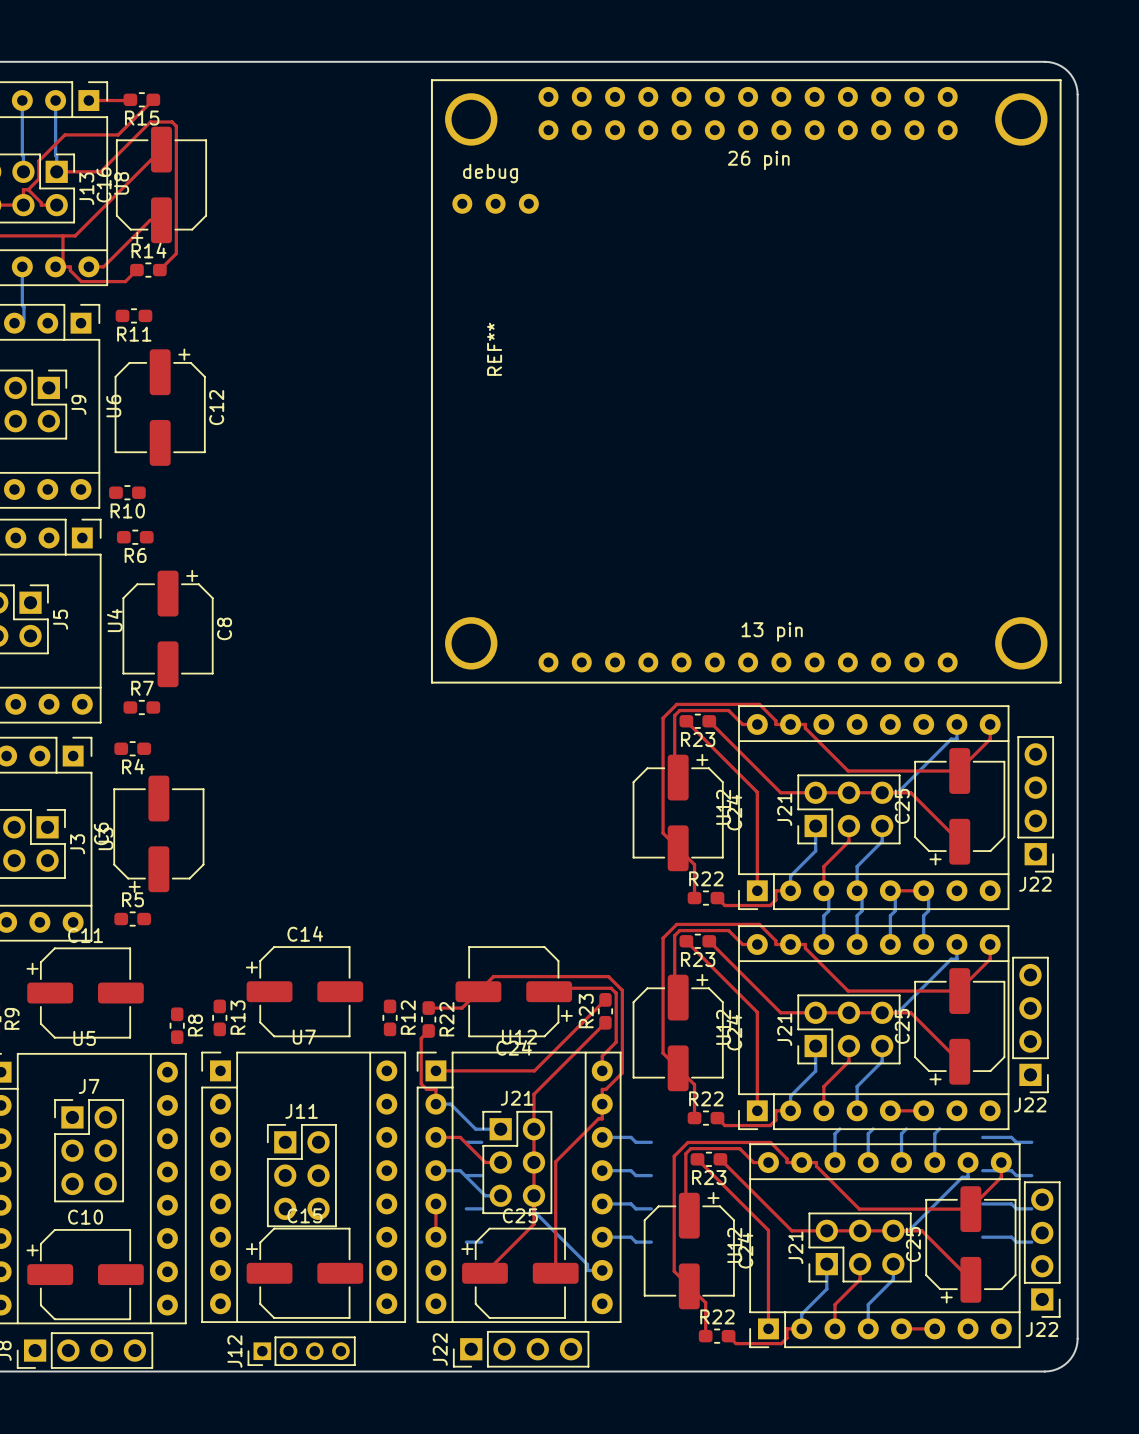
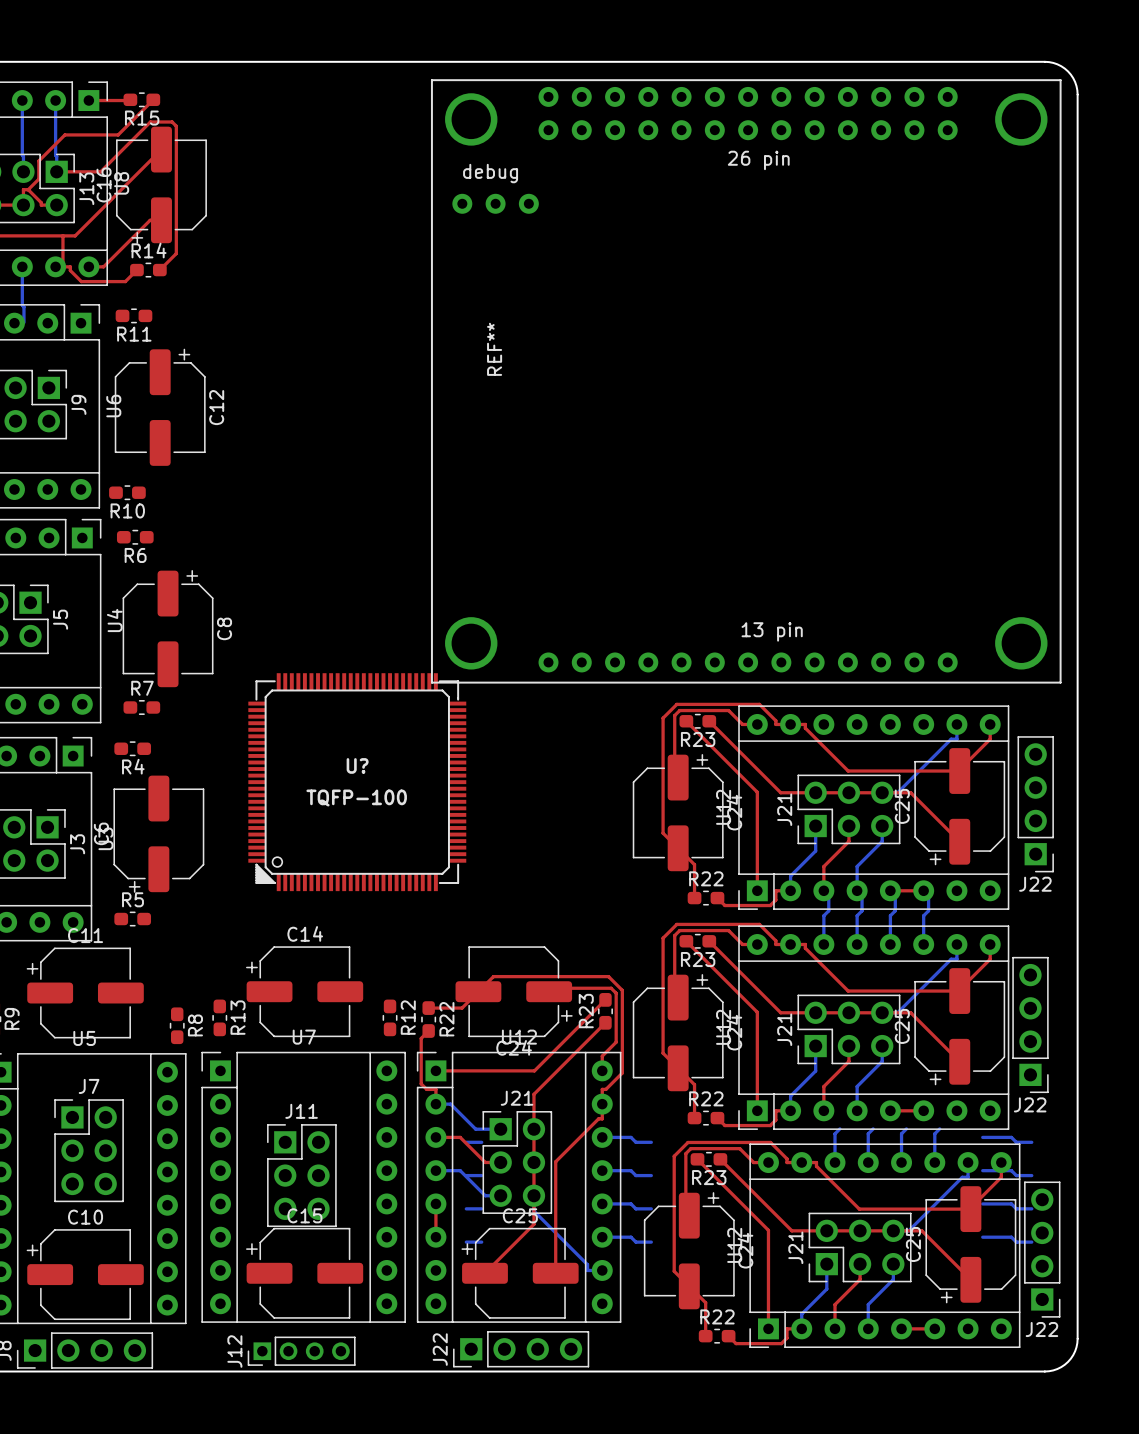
U?: none -> TQFP-100 (357, 782)

